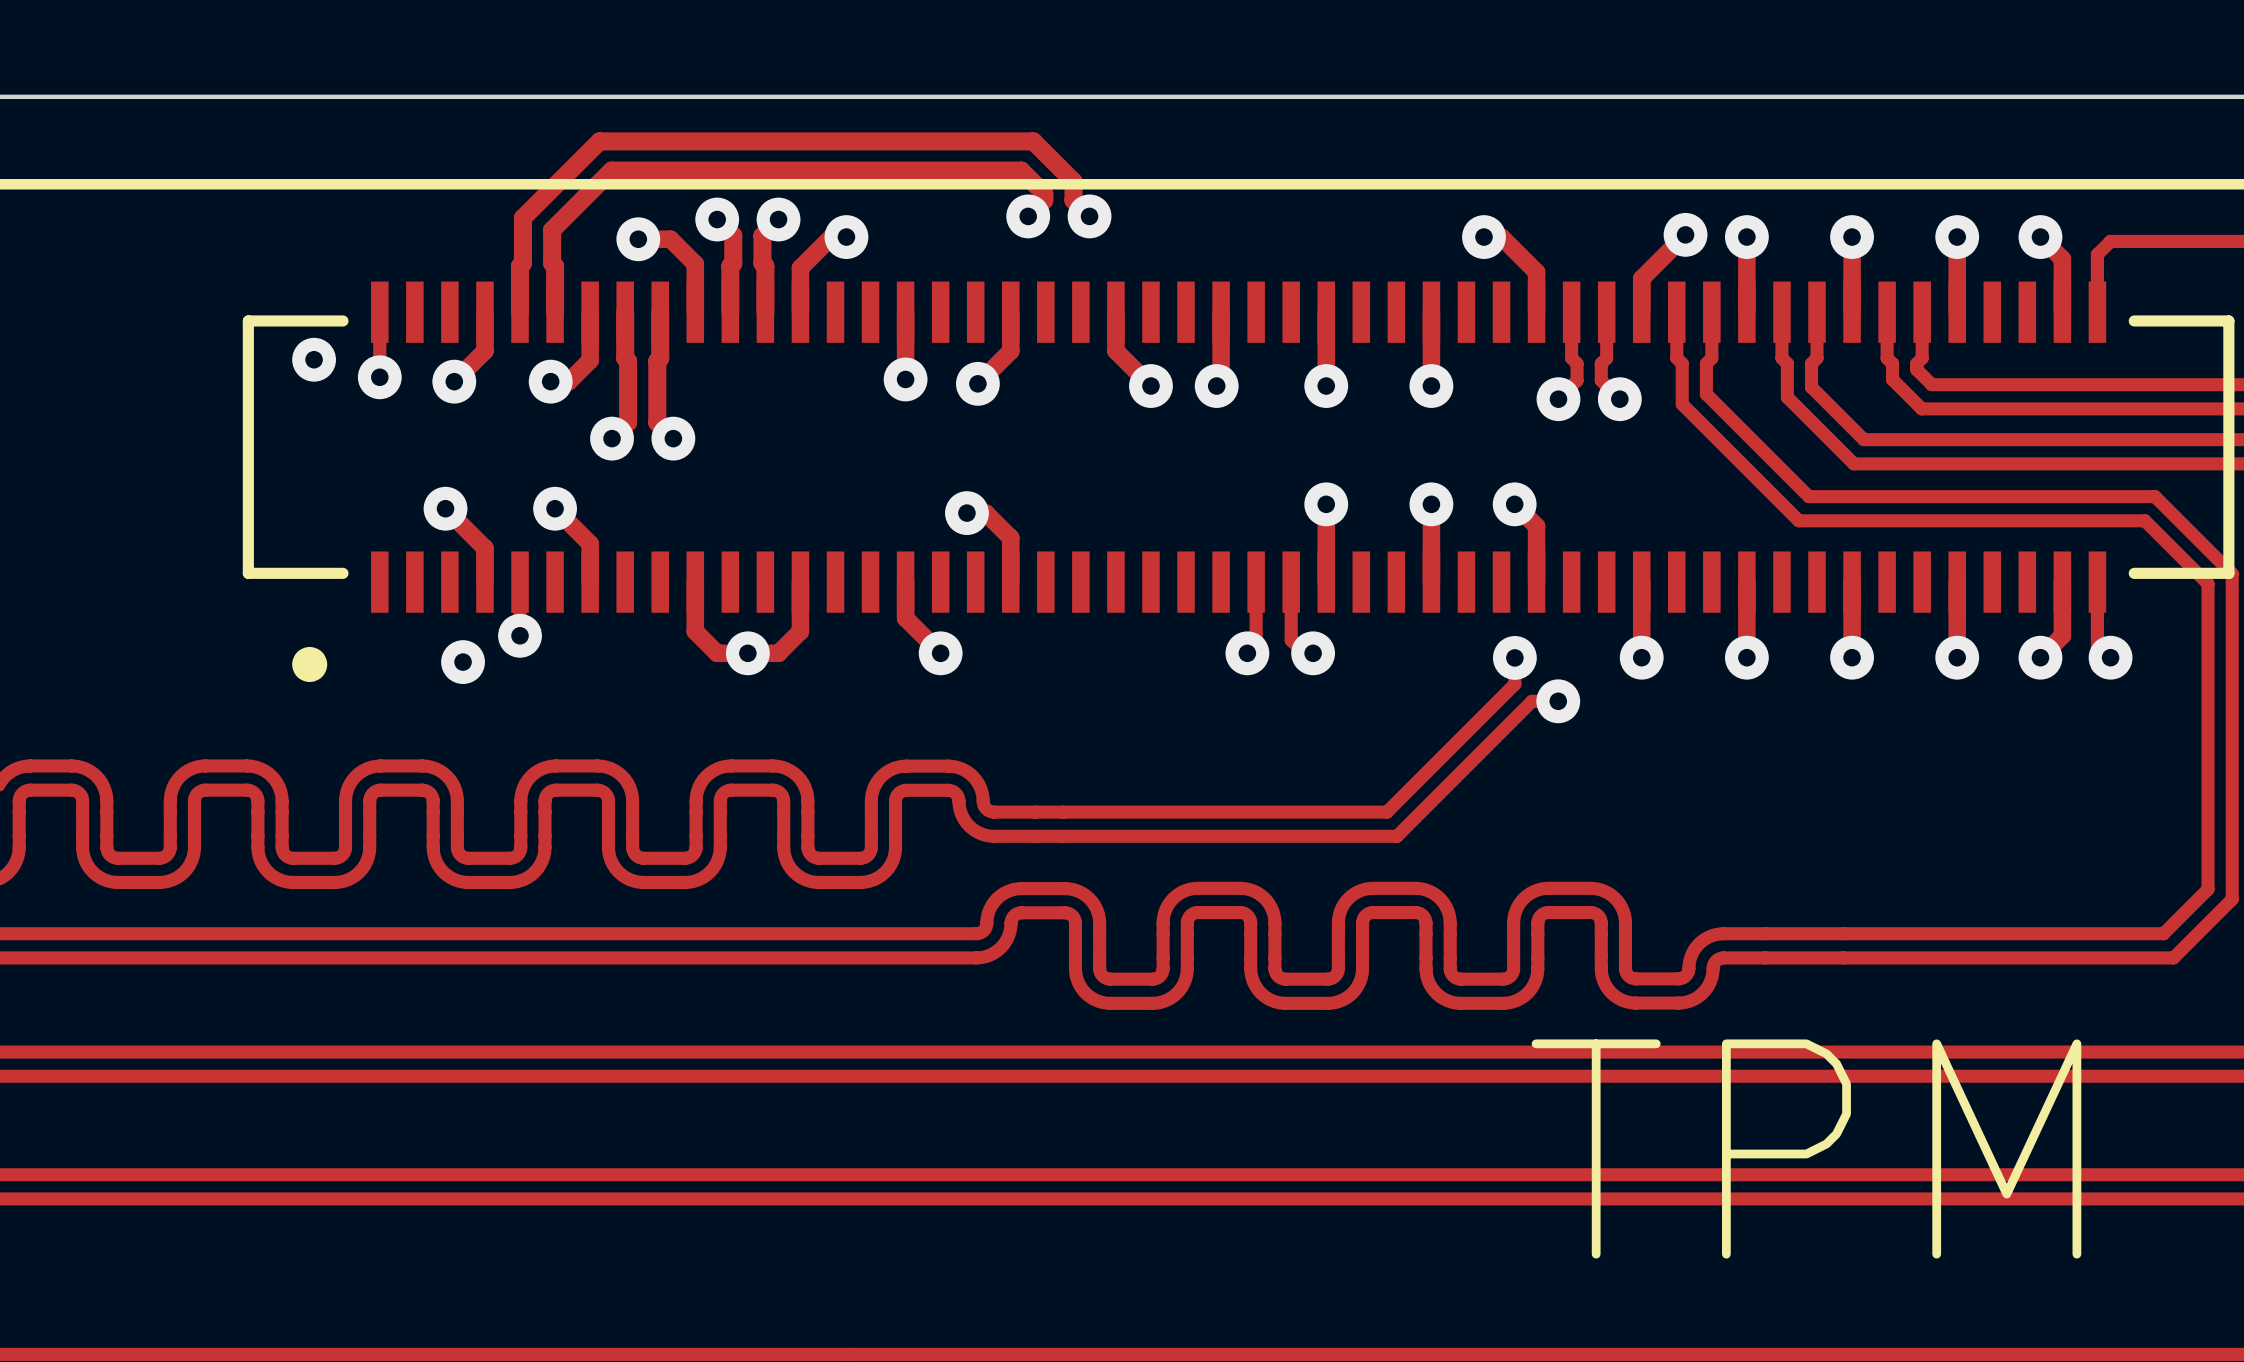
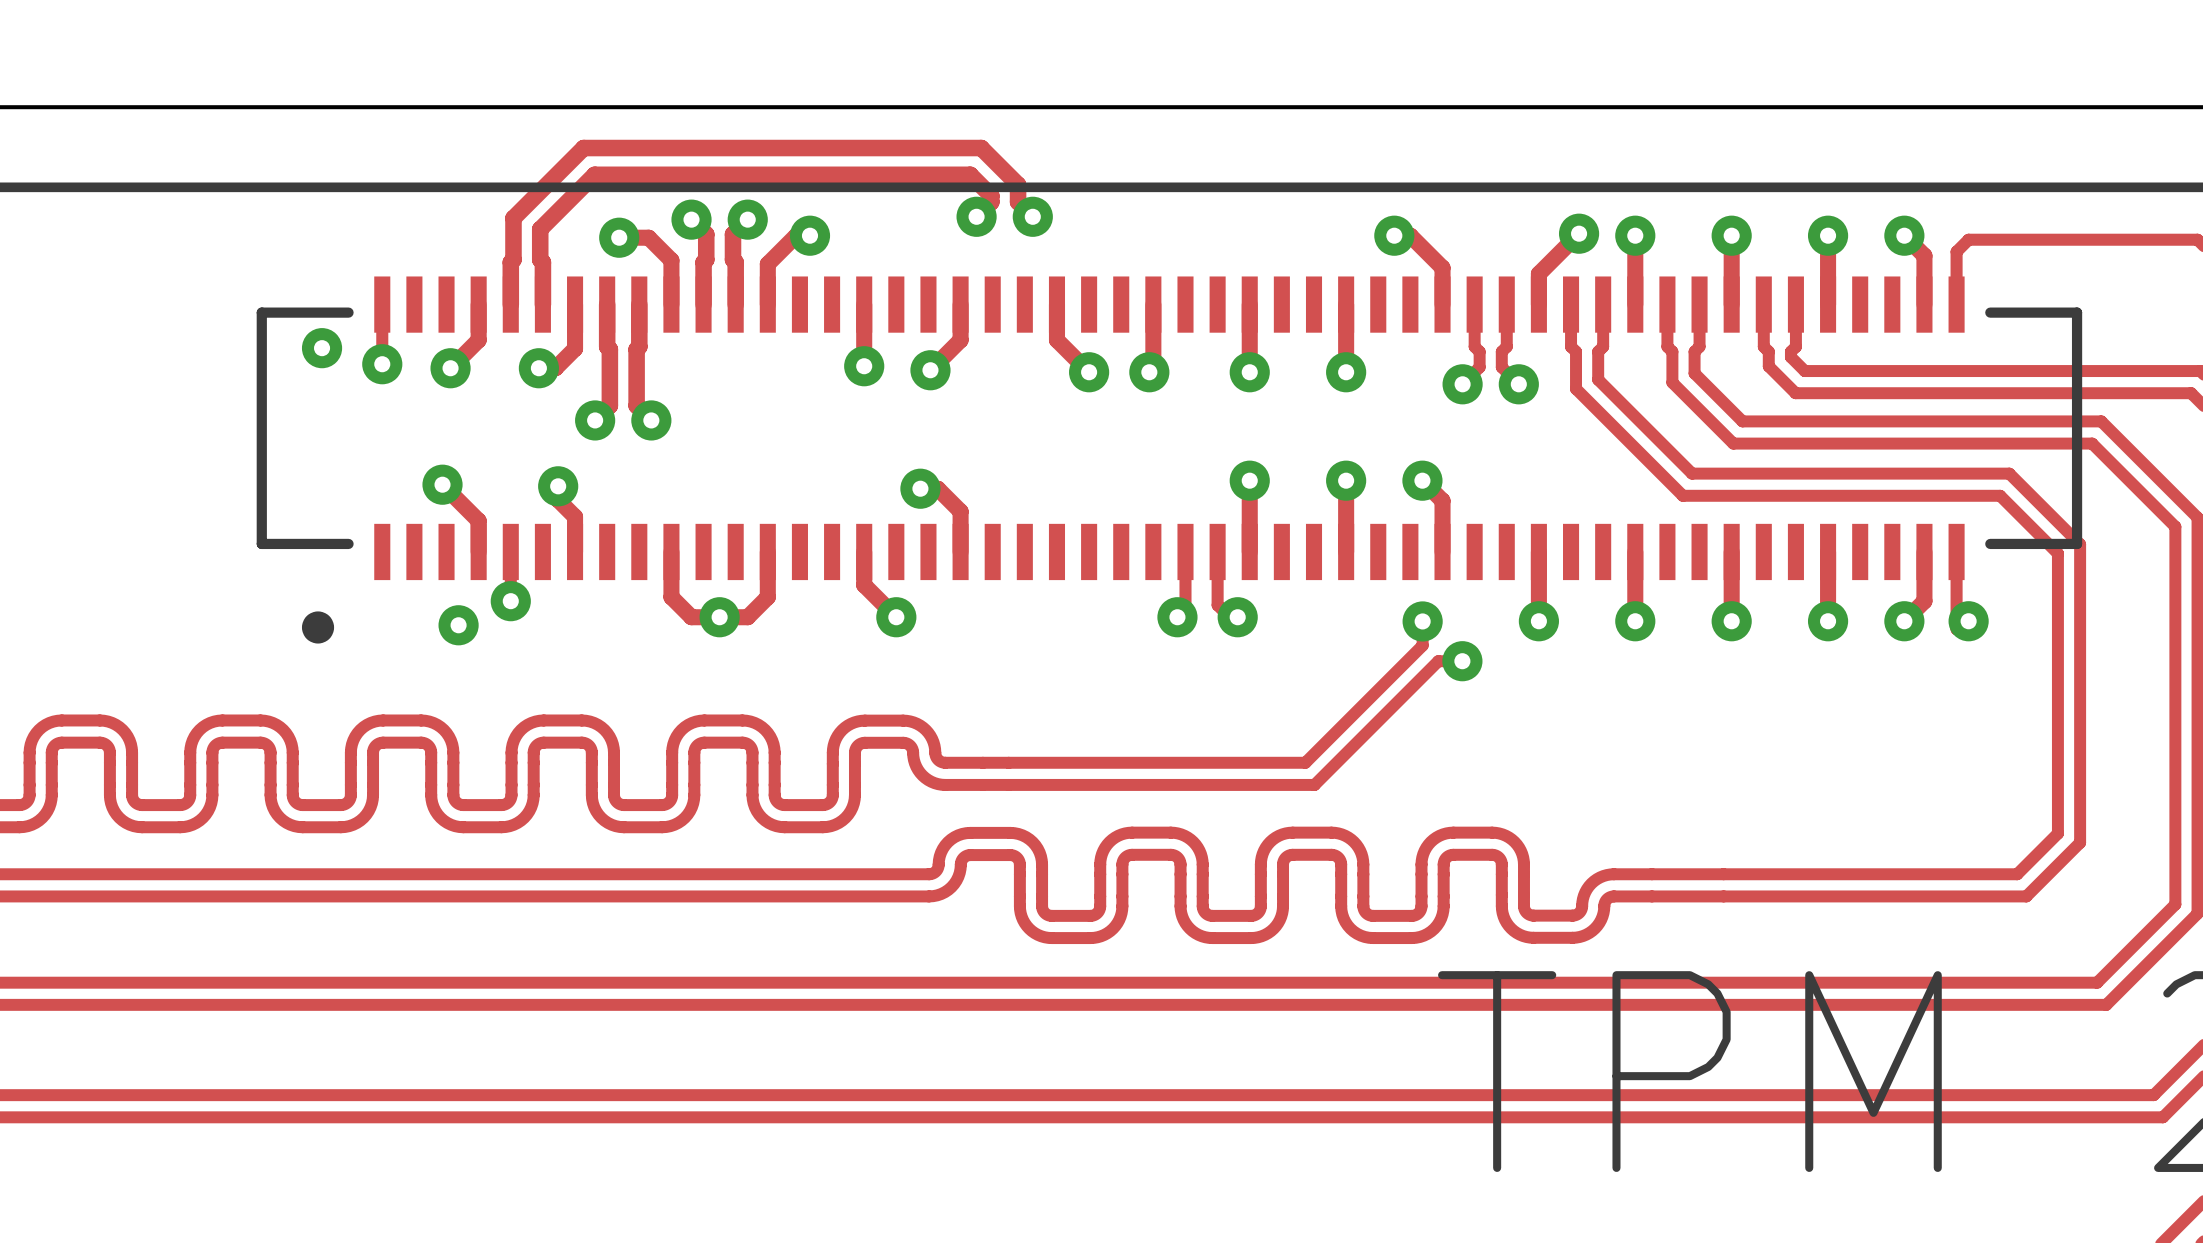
via position: (555, 508) -> (558, 486)

